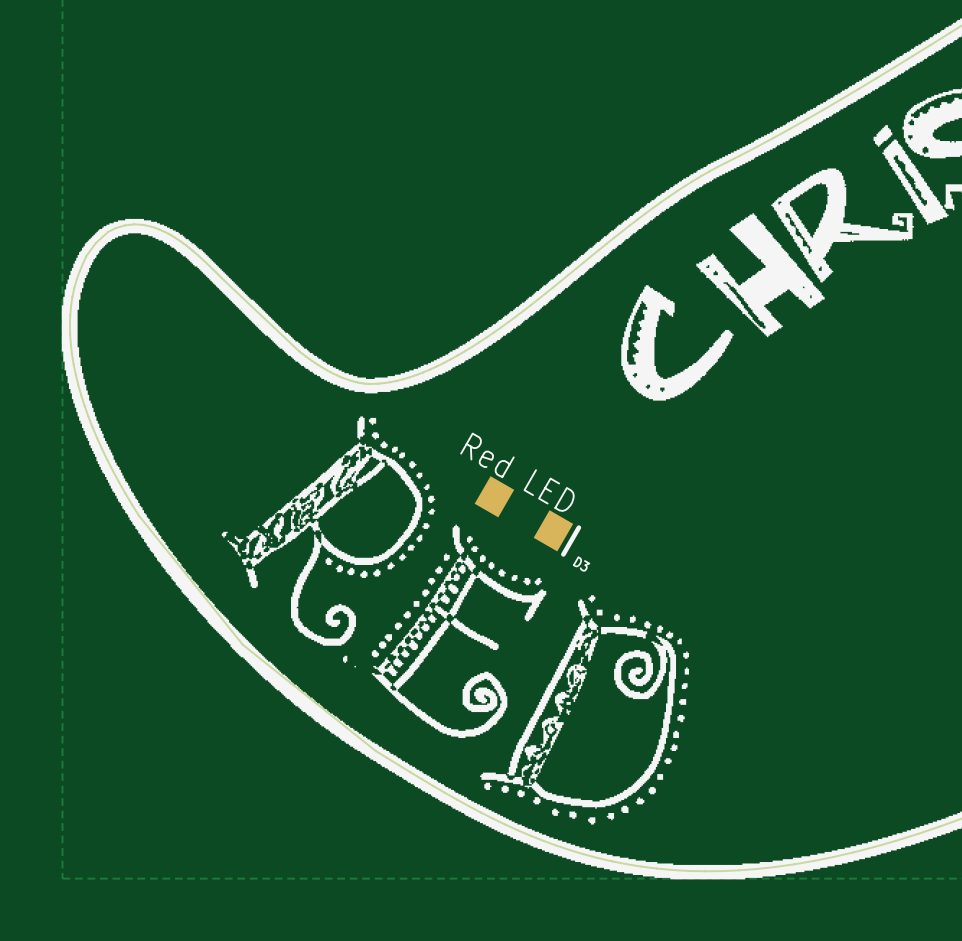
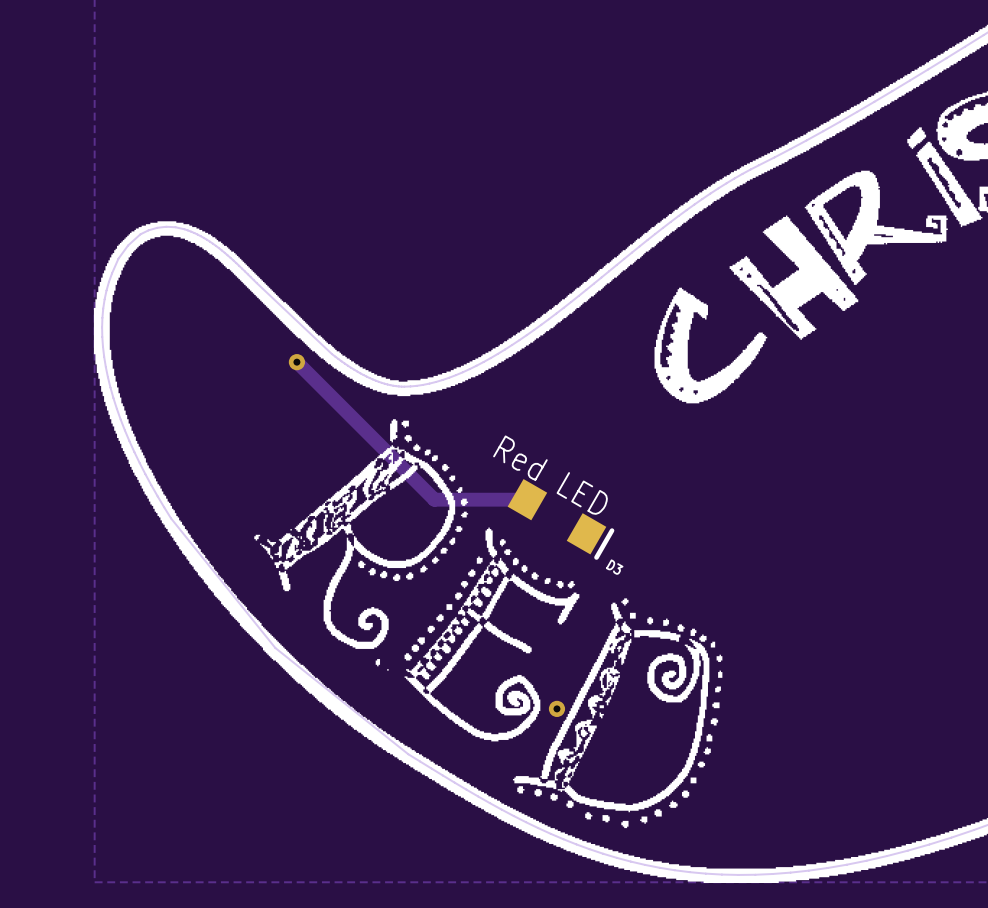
track: none -> (296, 362) (434, 499) (527, 499)
via: none -> (296, 362)
via: none -> (556, 708)

